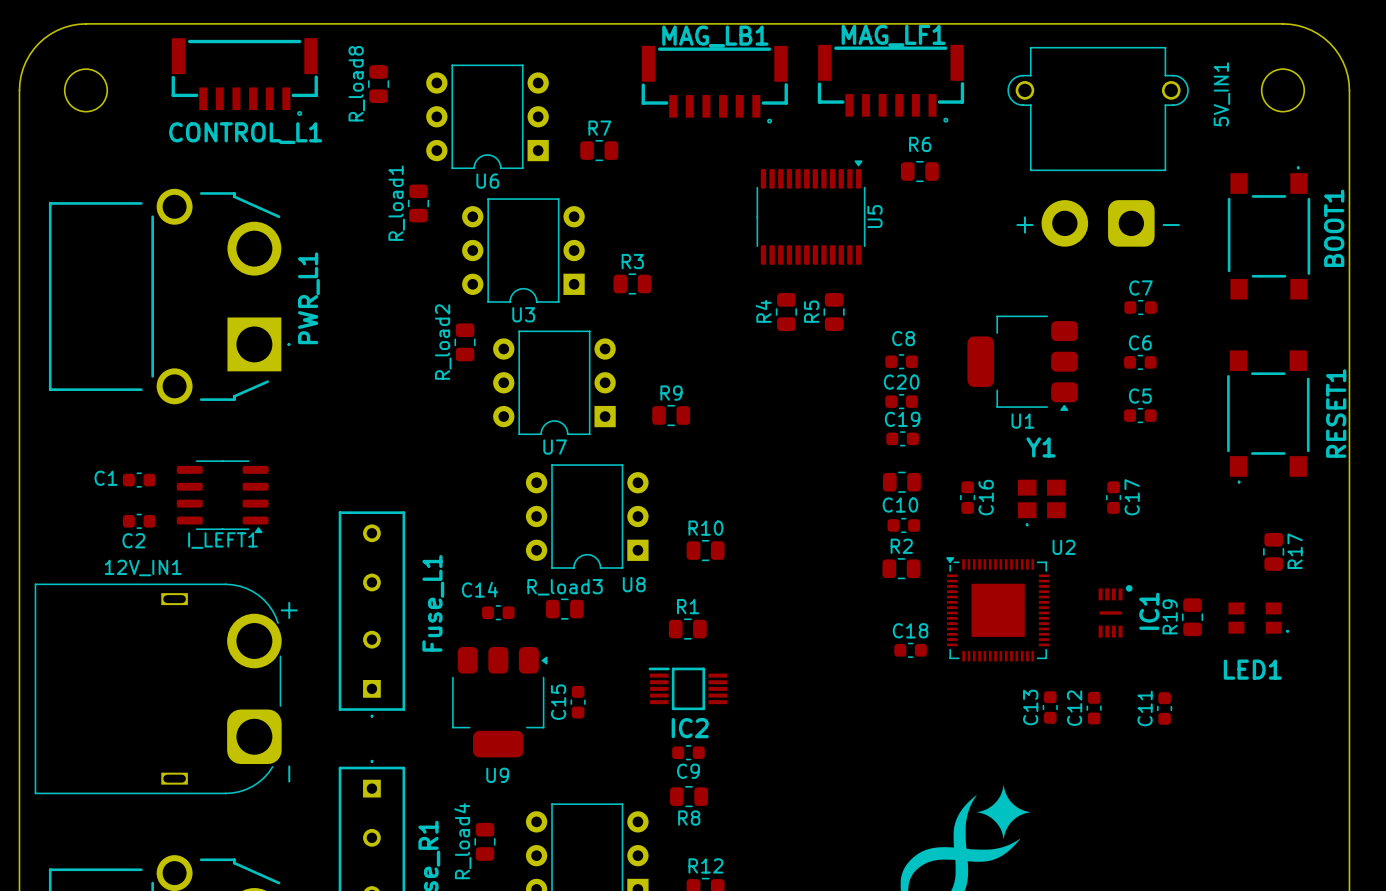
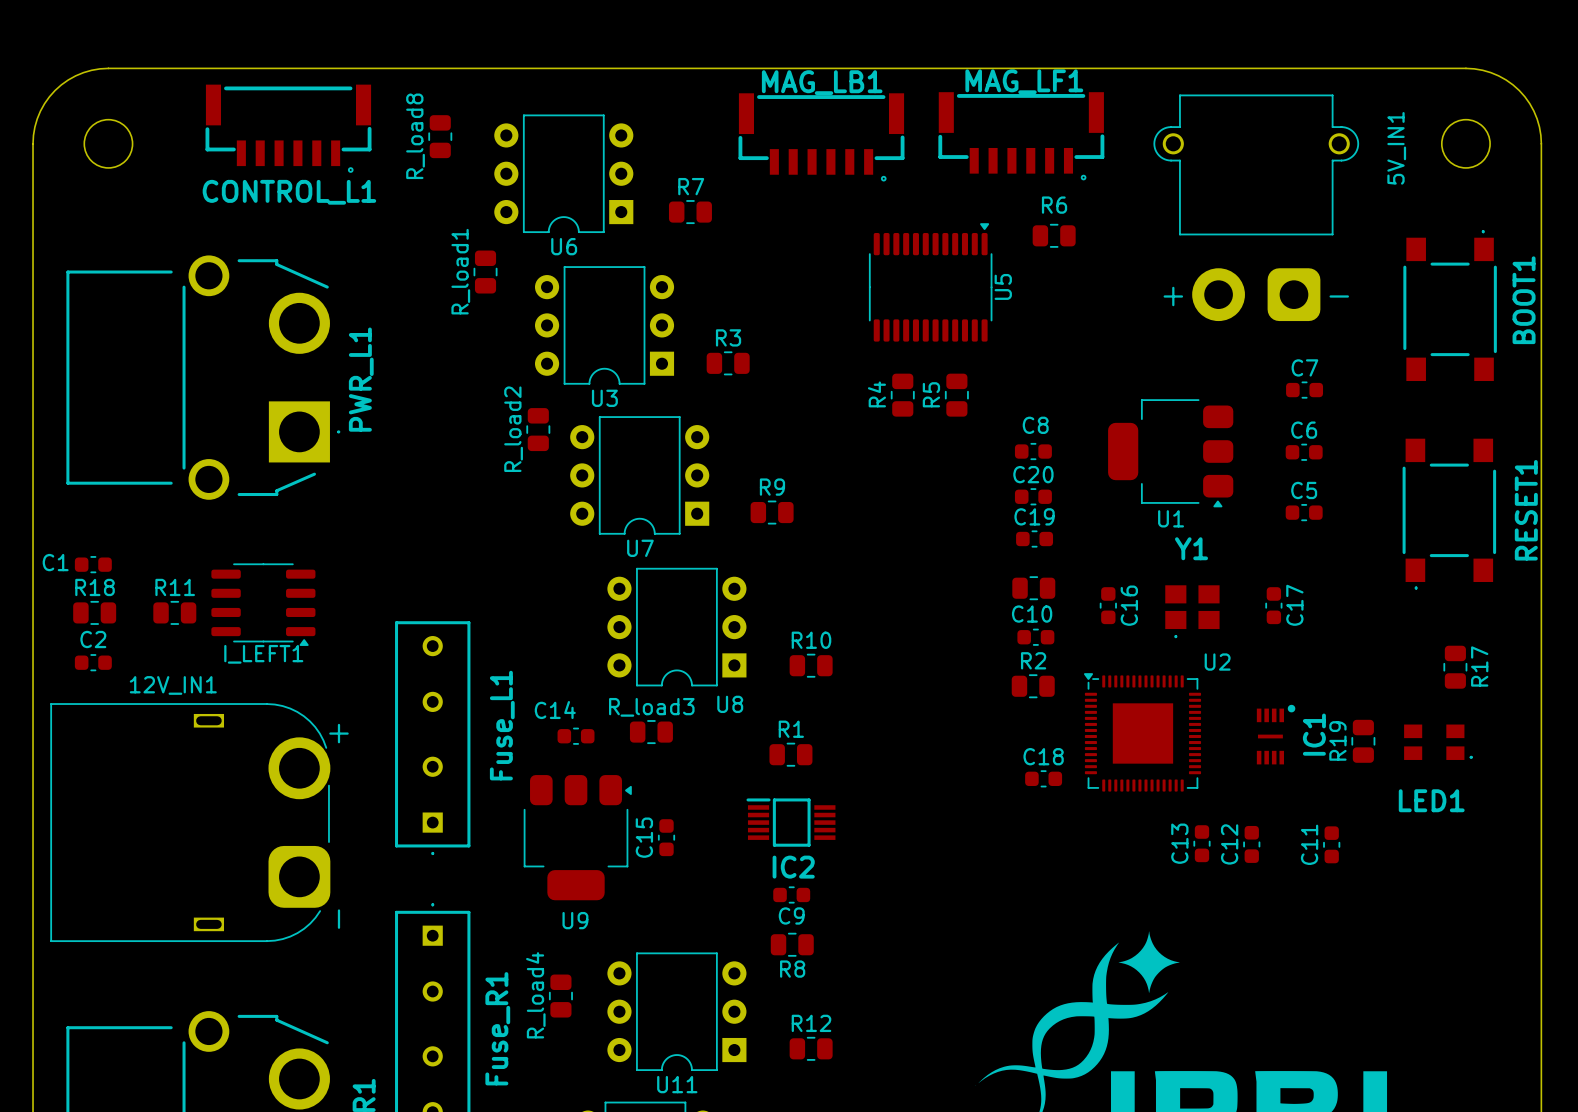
C1 position: (139, 480) -> (93, 564)
R18: none -> (94, 612)
R11: none -> (174, 612)
C2 position: (139, 521) -> (93, 662)
C2 name position: C2 (133, 540) -> C2 (93, 639)

